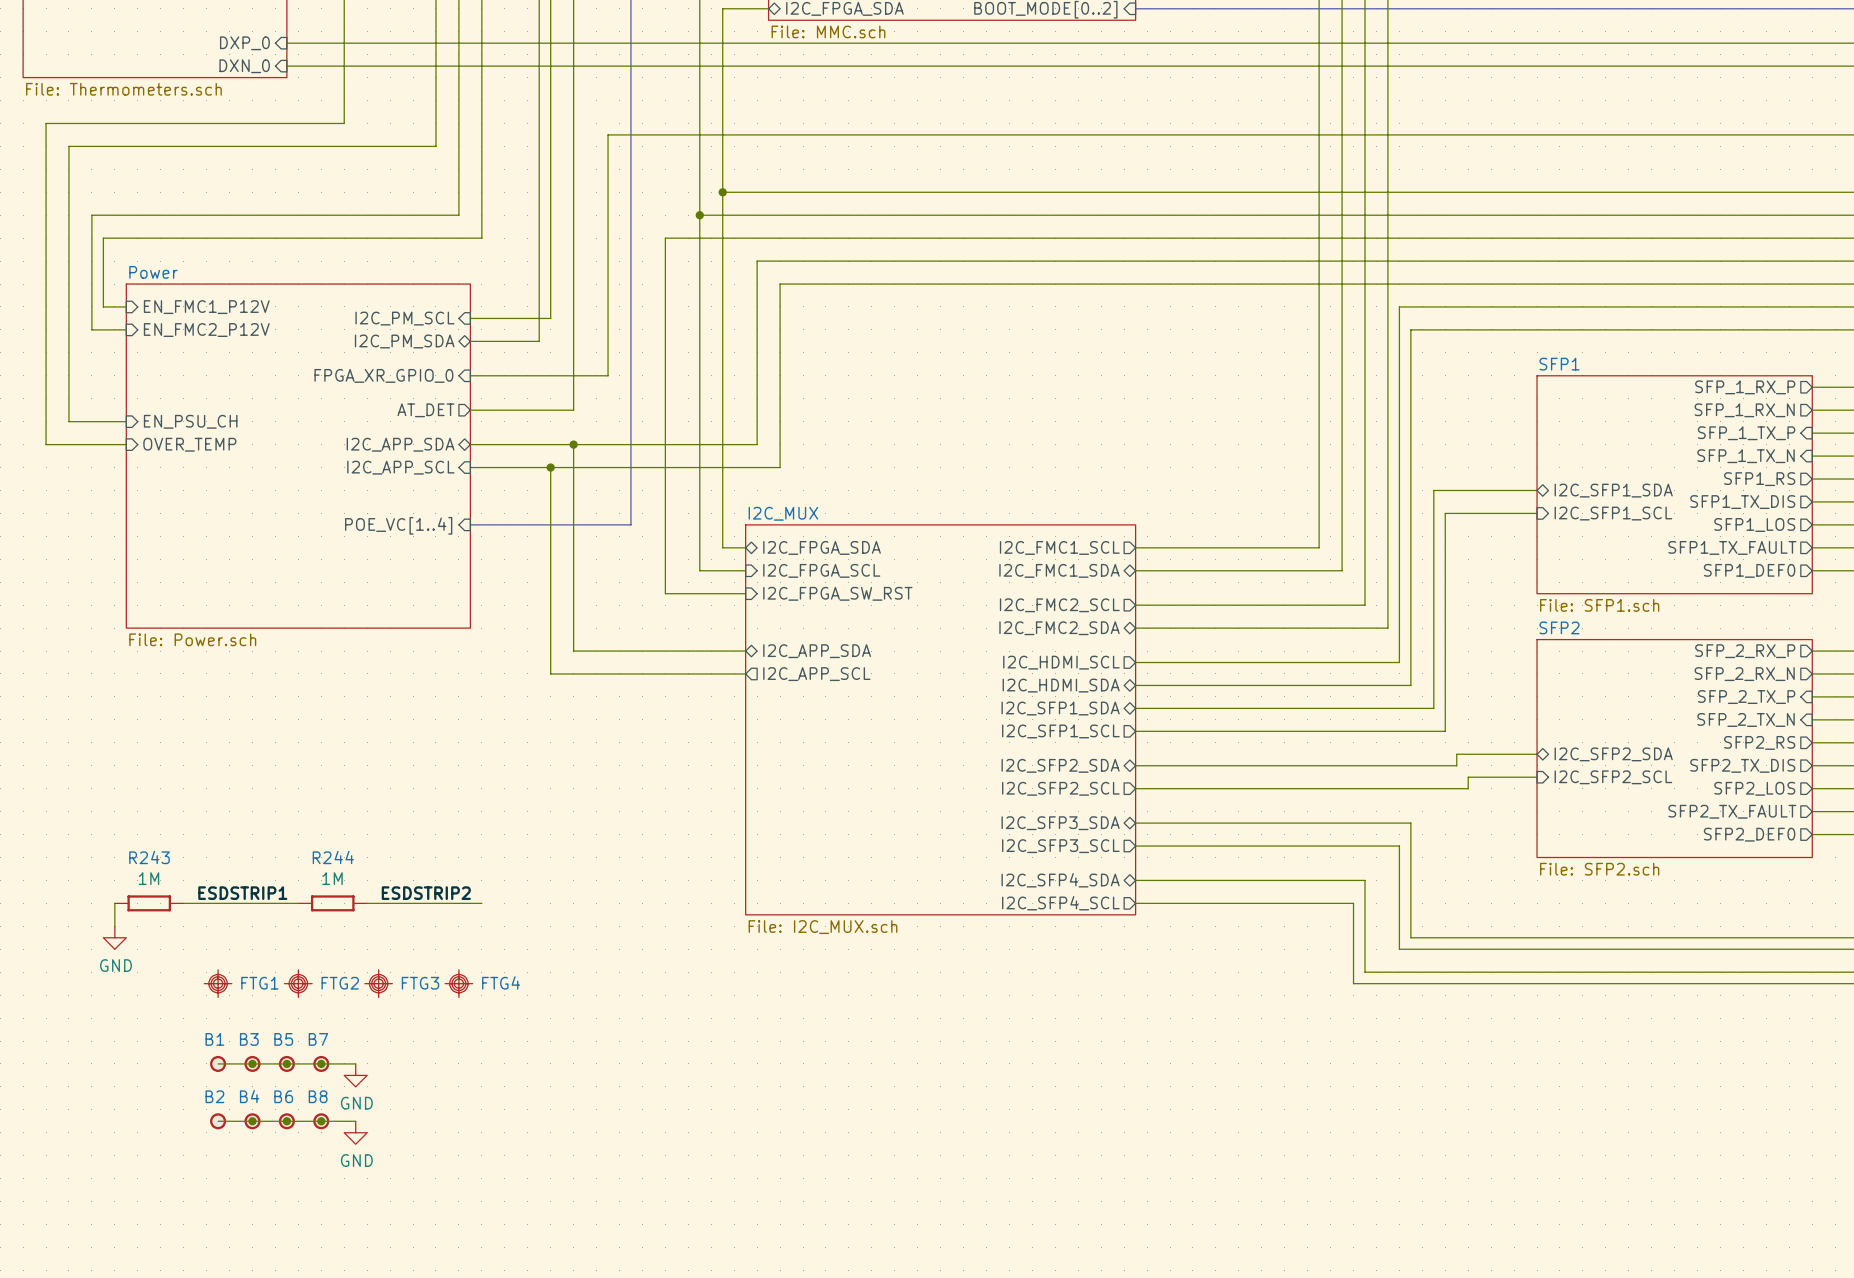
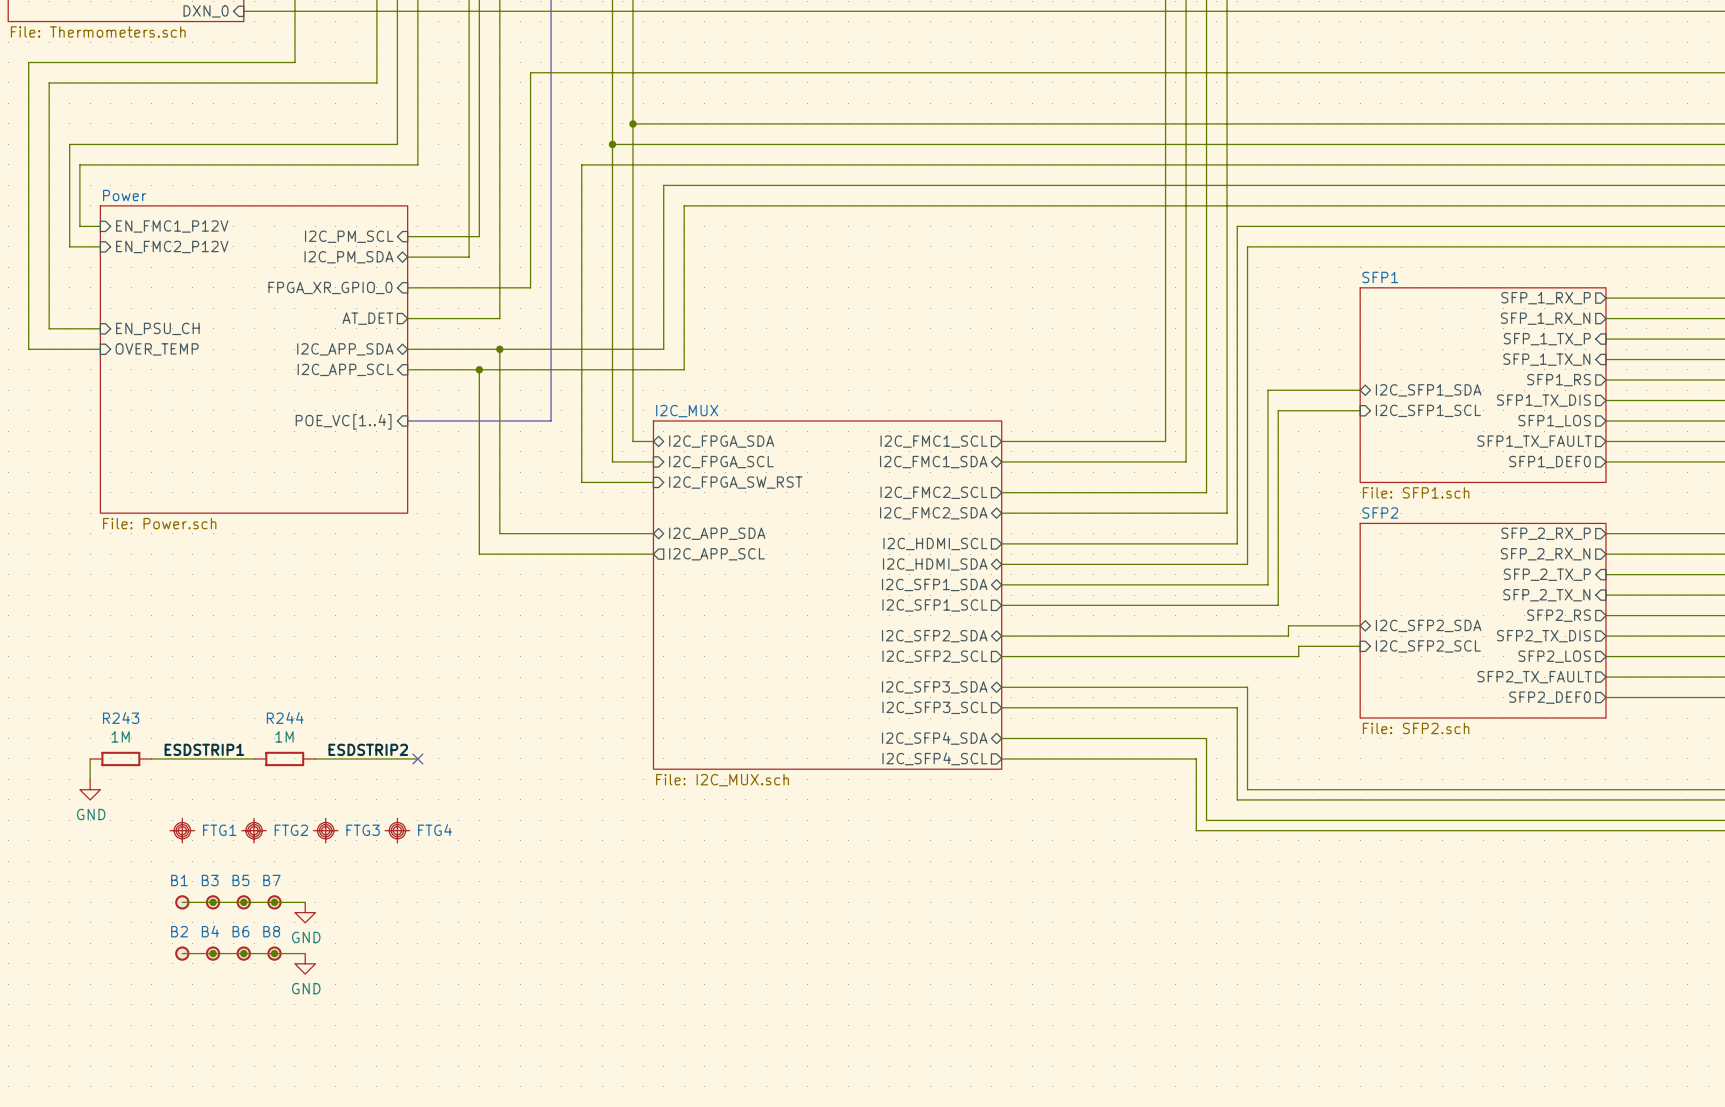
no-connect mark: none -> (417, 758)

